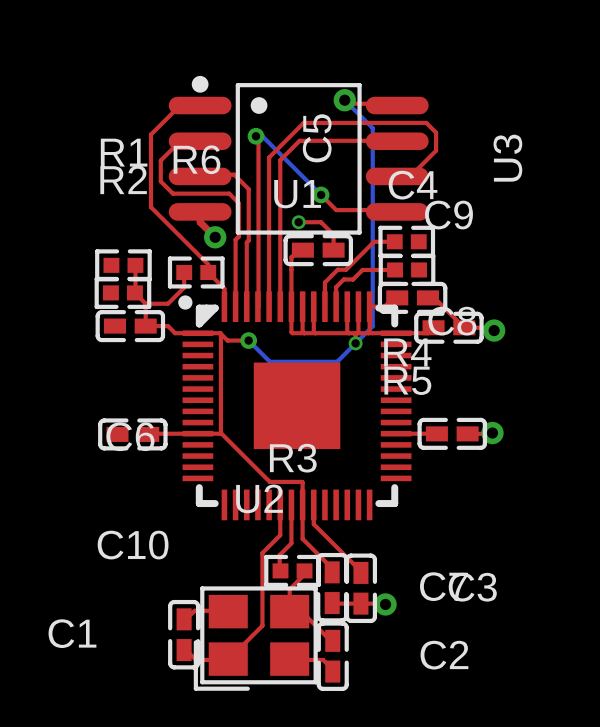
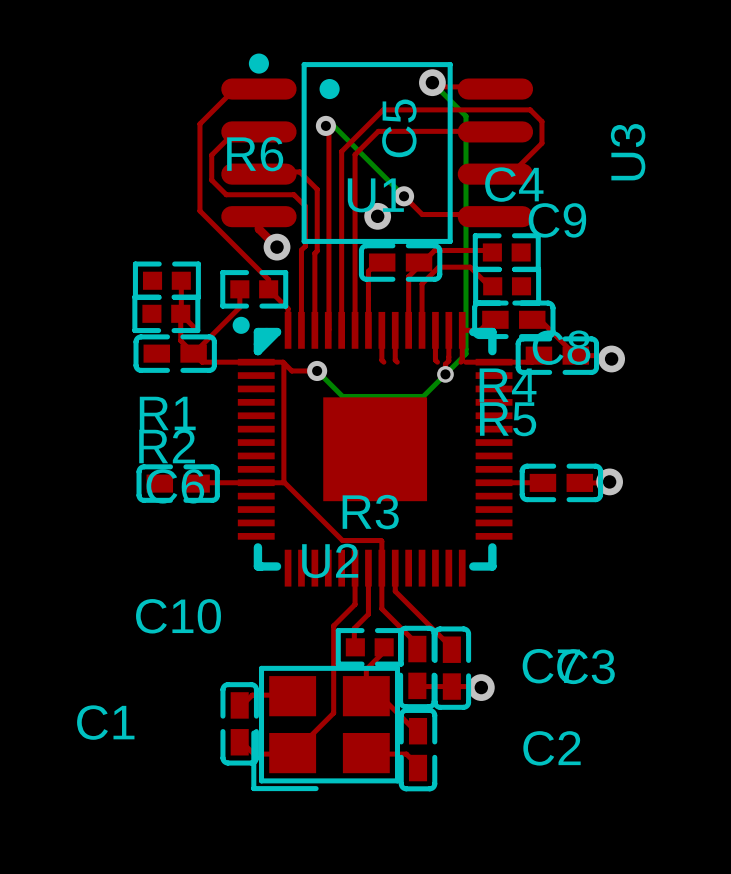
R1 name position: R1 (124, 152) -> R1 (167, 413)
R2 name position: R2 (123, 179) -> R2 (167, 446)
via size: [291, 215, 306, 230] -> [364, 202, 392, 230]
top track: (298, 222) (321, 222) (333, 234) (333, 250) -> none
top track: (394, 241) (374, 241) (346, 269) (337, 269) (324, 282) -> (483, 250) (434, 250) (408, 276) (408, 301)
top track: (395, 269) (362, 269) (353, 279) (343, 279) (336, 287) -> (492, 286) (489, 286) (470, 267) (438, 267) (422, 283) (422, 306)
top track: none -> (180, 313) (180, 340) (202, 362) (228, 362)
top track: (168, 303) (145, 303) (145, 326) (168, 326) (175, 333) -> (220, 326) (193, 353)
top track: (291, 306) (292, 333) (372, 333) -> none

